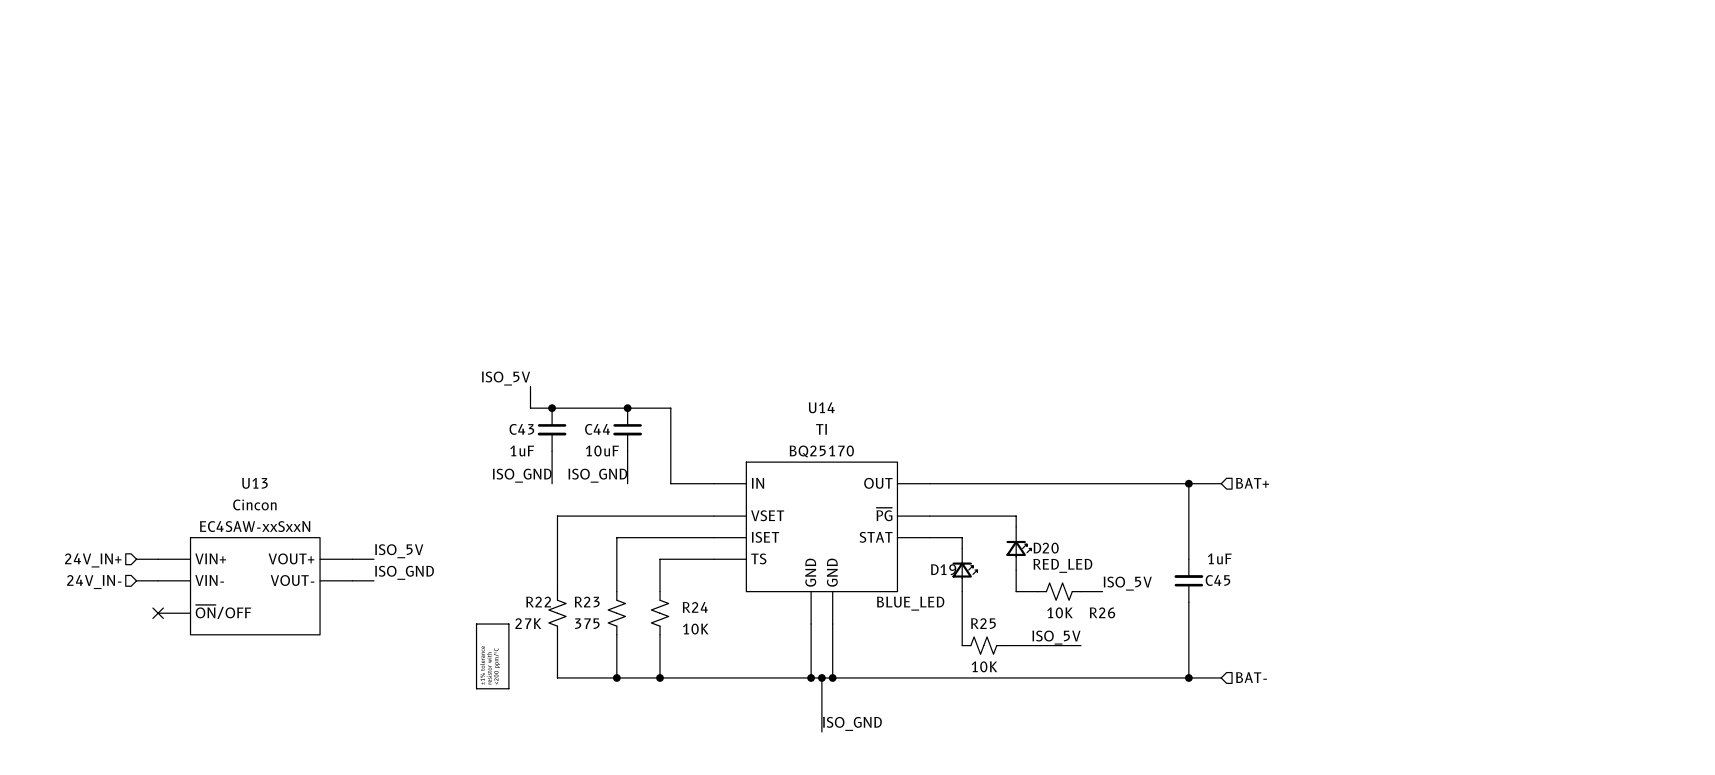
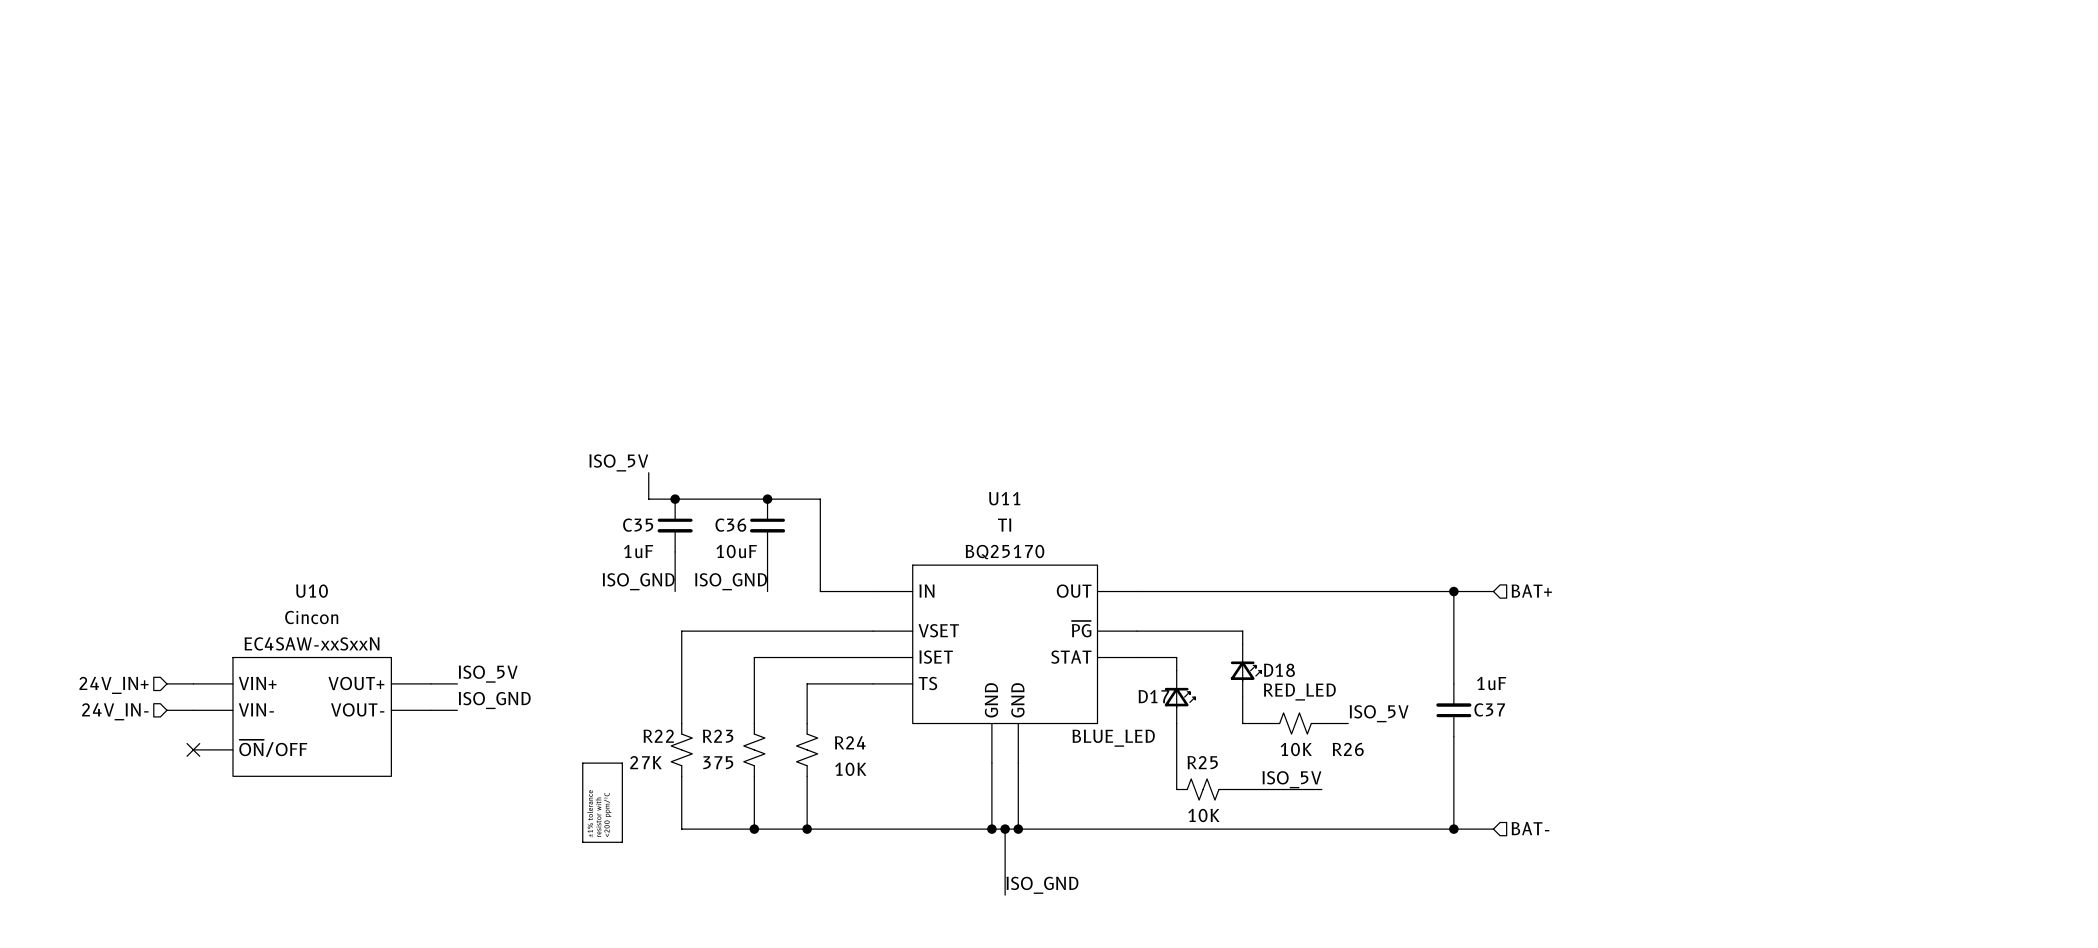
U14 name: U14 (821, 407) -> U11 (1004, 498)
C43 name: C43 (521, 429) -> C35 (638, 525)
C44 name: C44 (597, 429) -> C36 (730, 525)
U13 name: U13 (254, 483) -> U10 (312, 591)
D20 name: D20 (1046, 548) -> D18 (1279, 670)
D19 name: D19 (943, 569) -> D17 (1153, 696)
C45 name: C45 (1217, 580) -> C37 (1489, 709)

